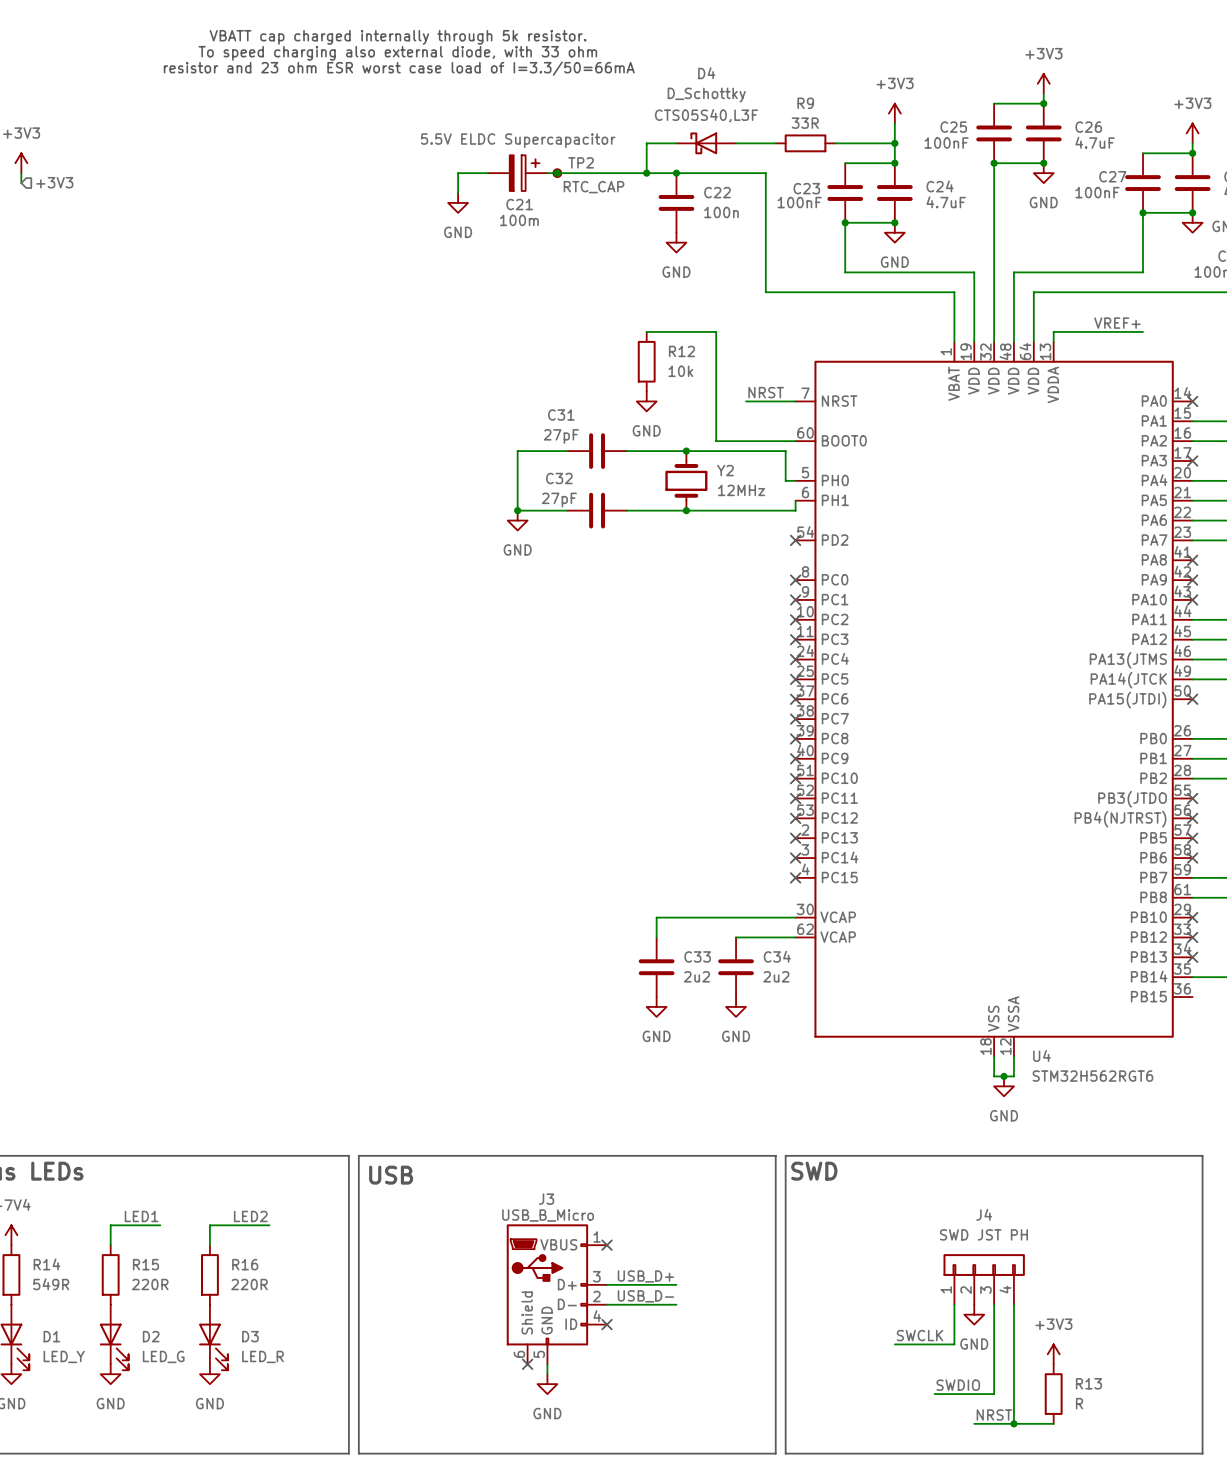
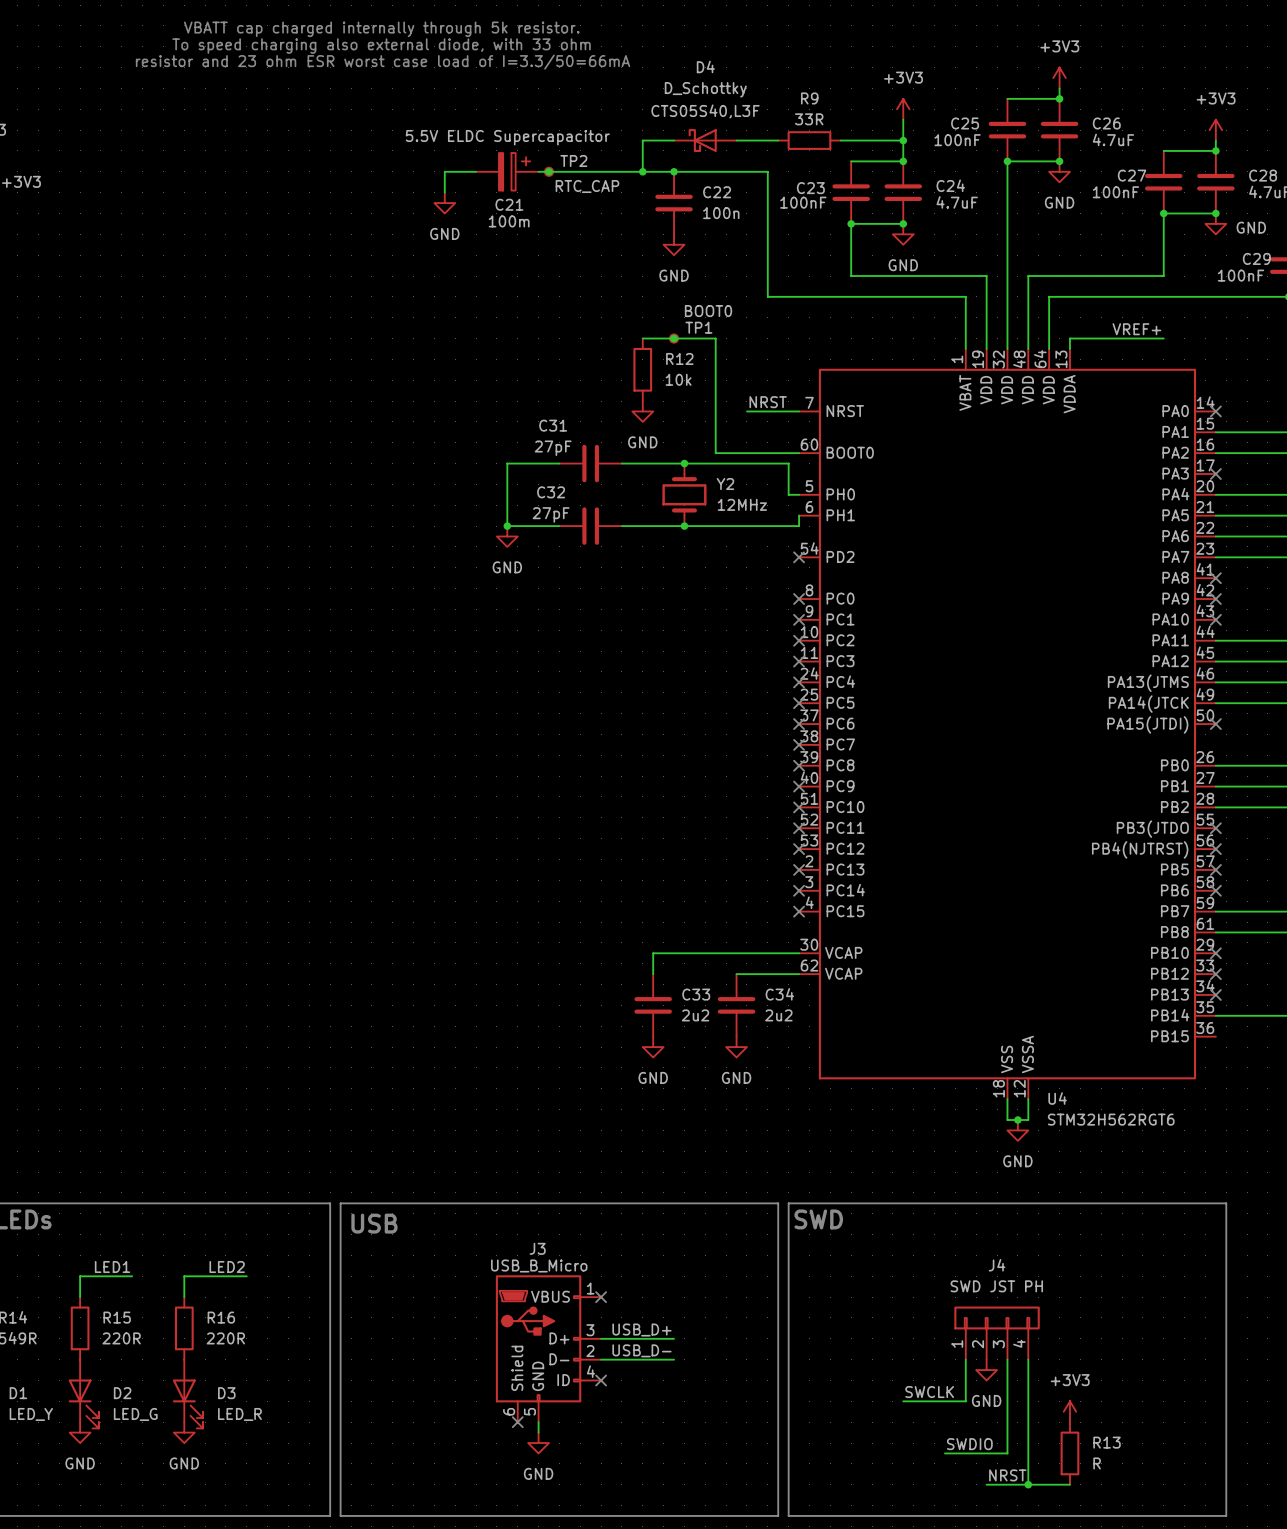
junction: none -> (674, 338)
TP1: none -> BOOT0 (674, 338)

